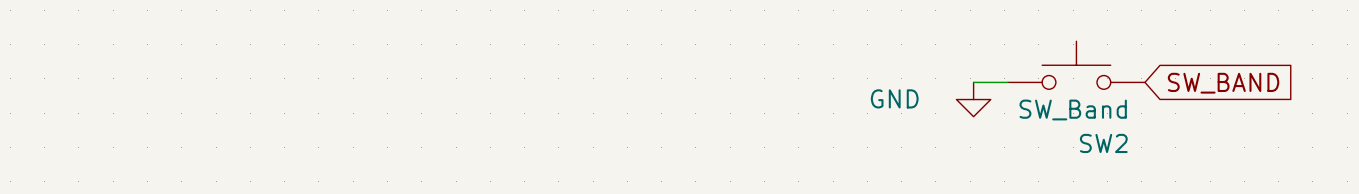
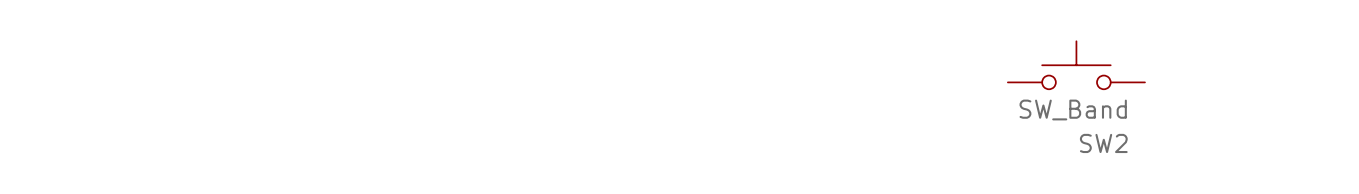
wire: (973, 82) (1007, 82) -> none
global label: SW_BAND (1223, 83) -> none
power symbol: GND (973, 99) -> none

